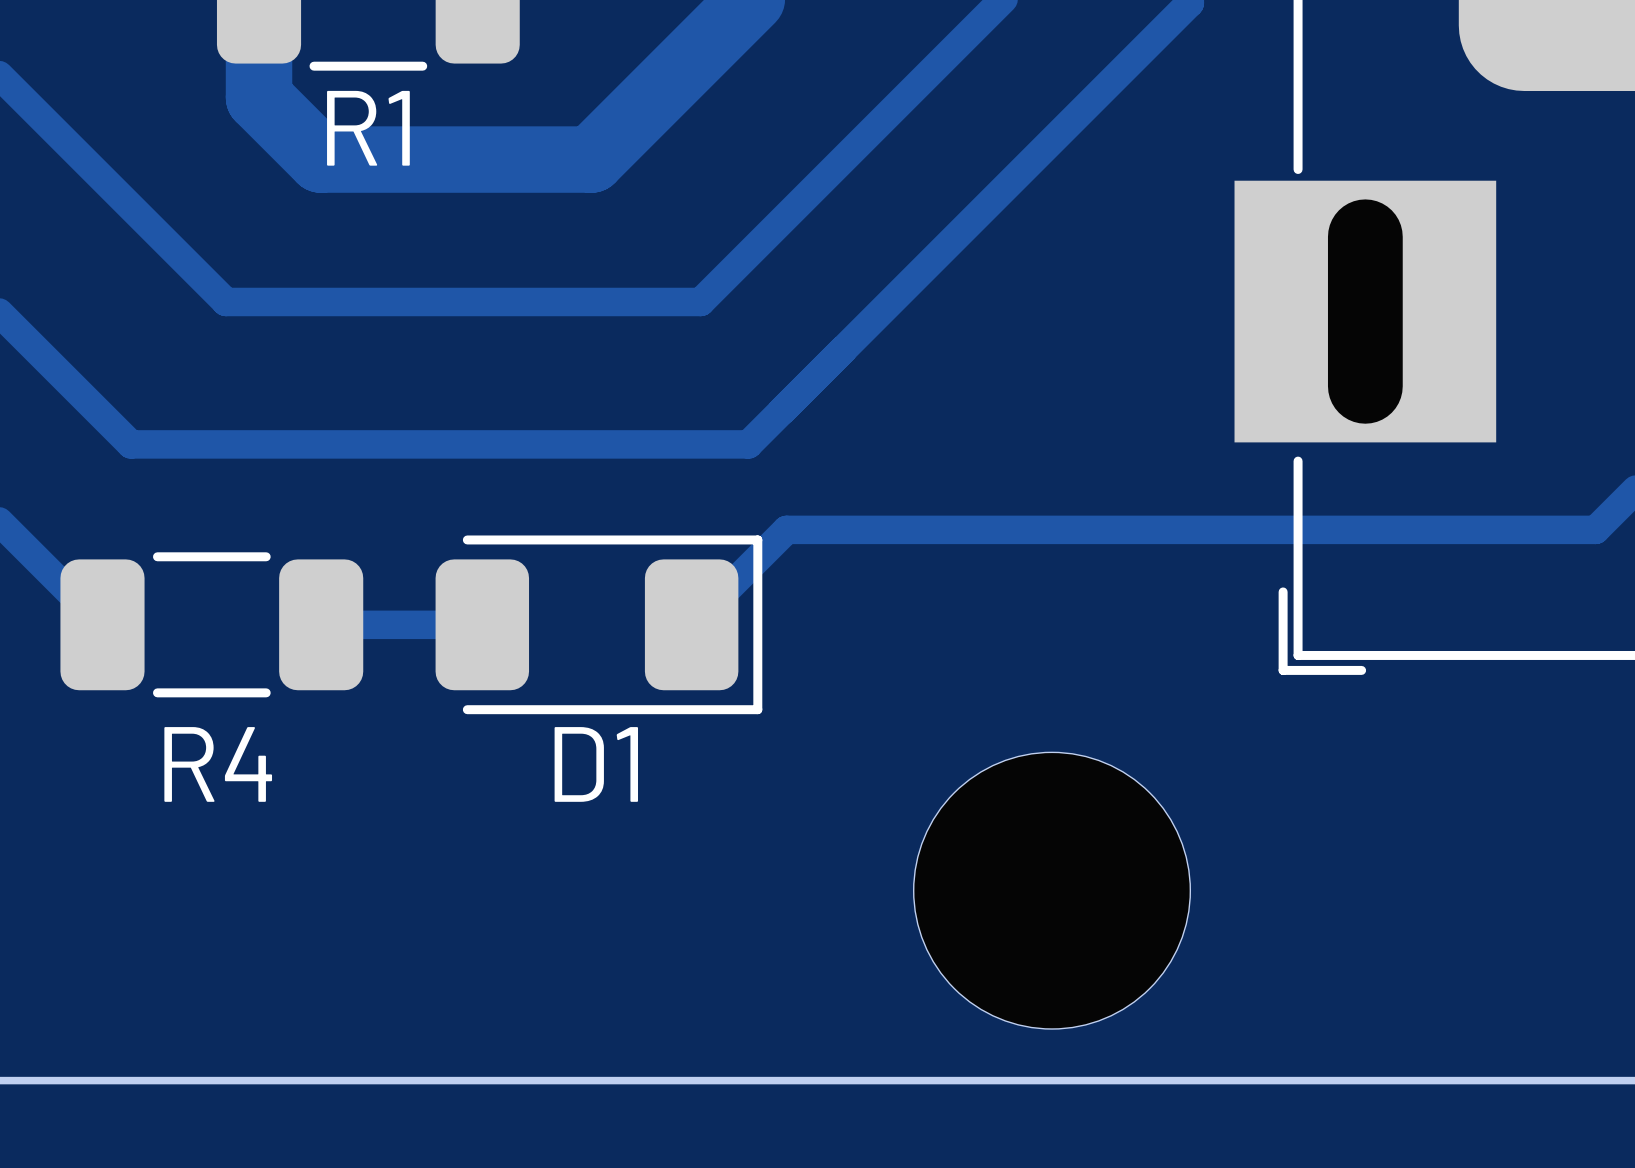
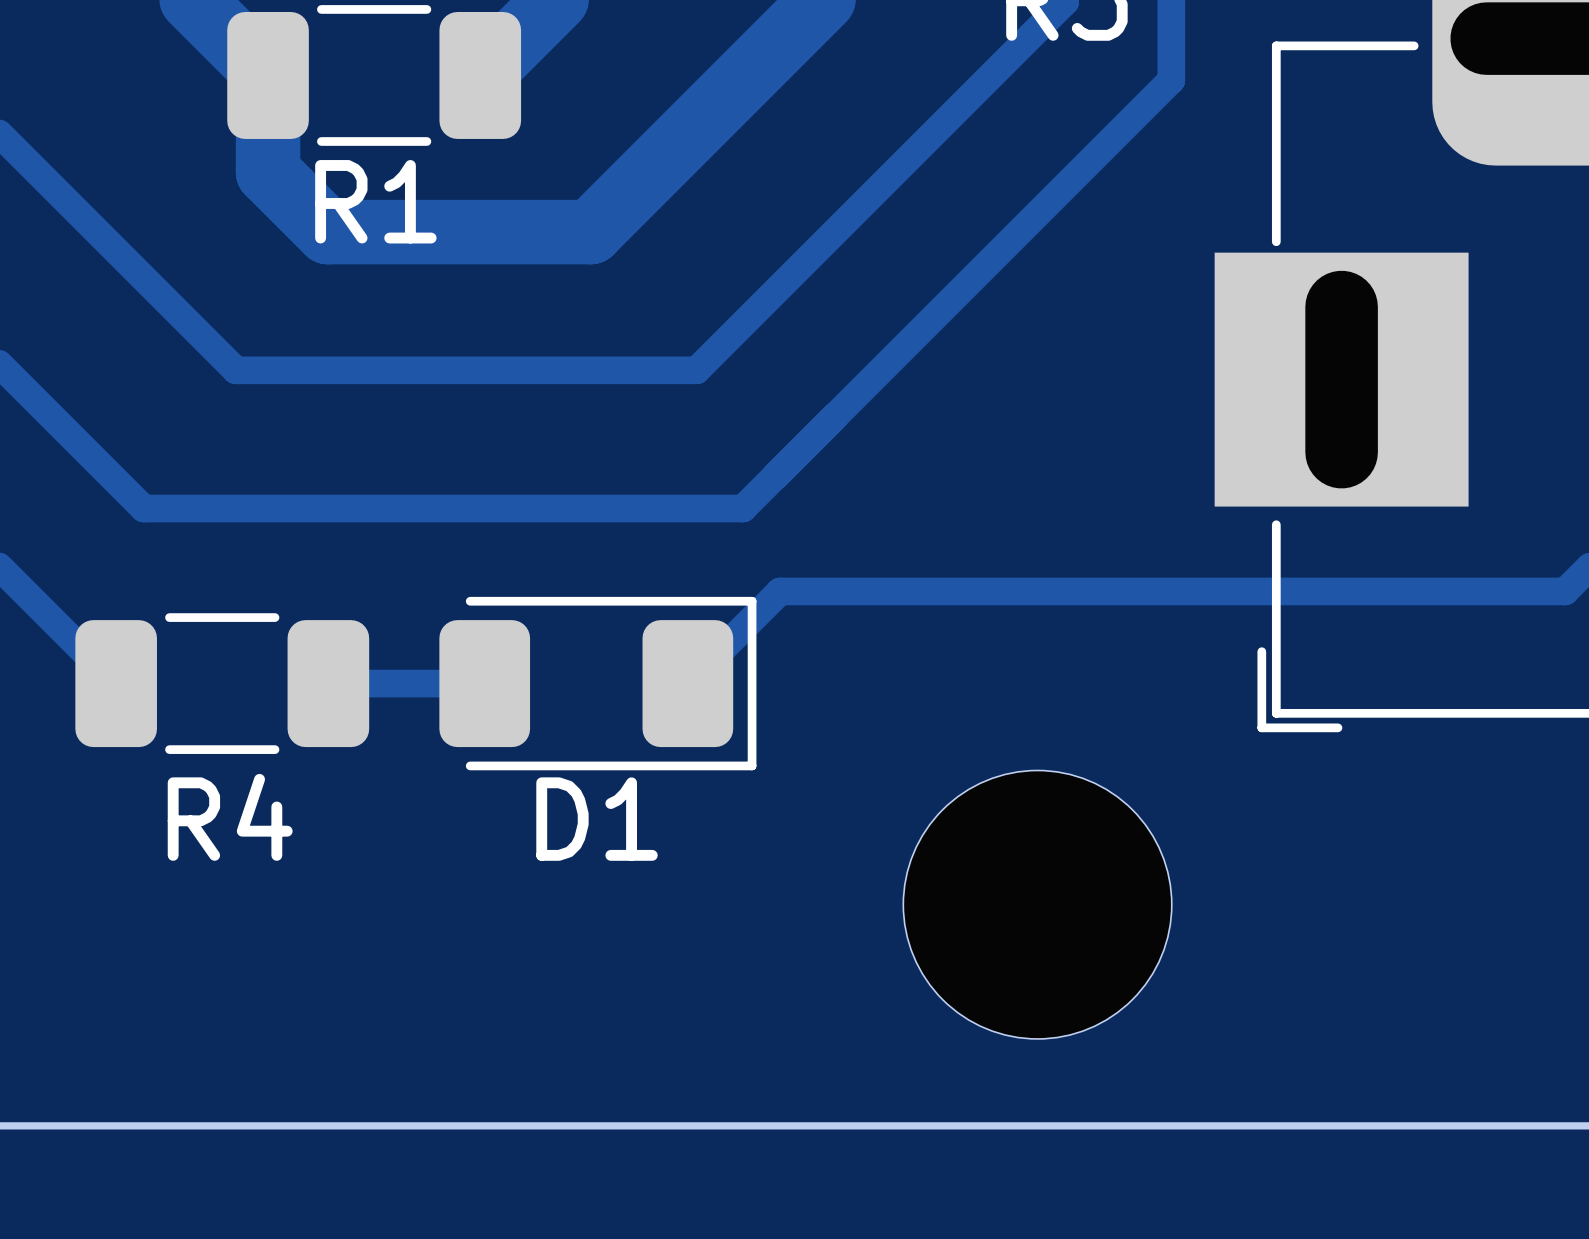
part position: (1052, 890) -> (1037, 904)

